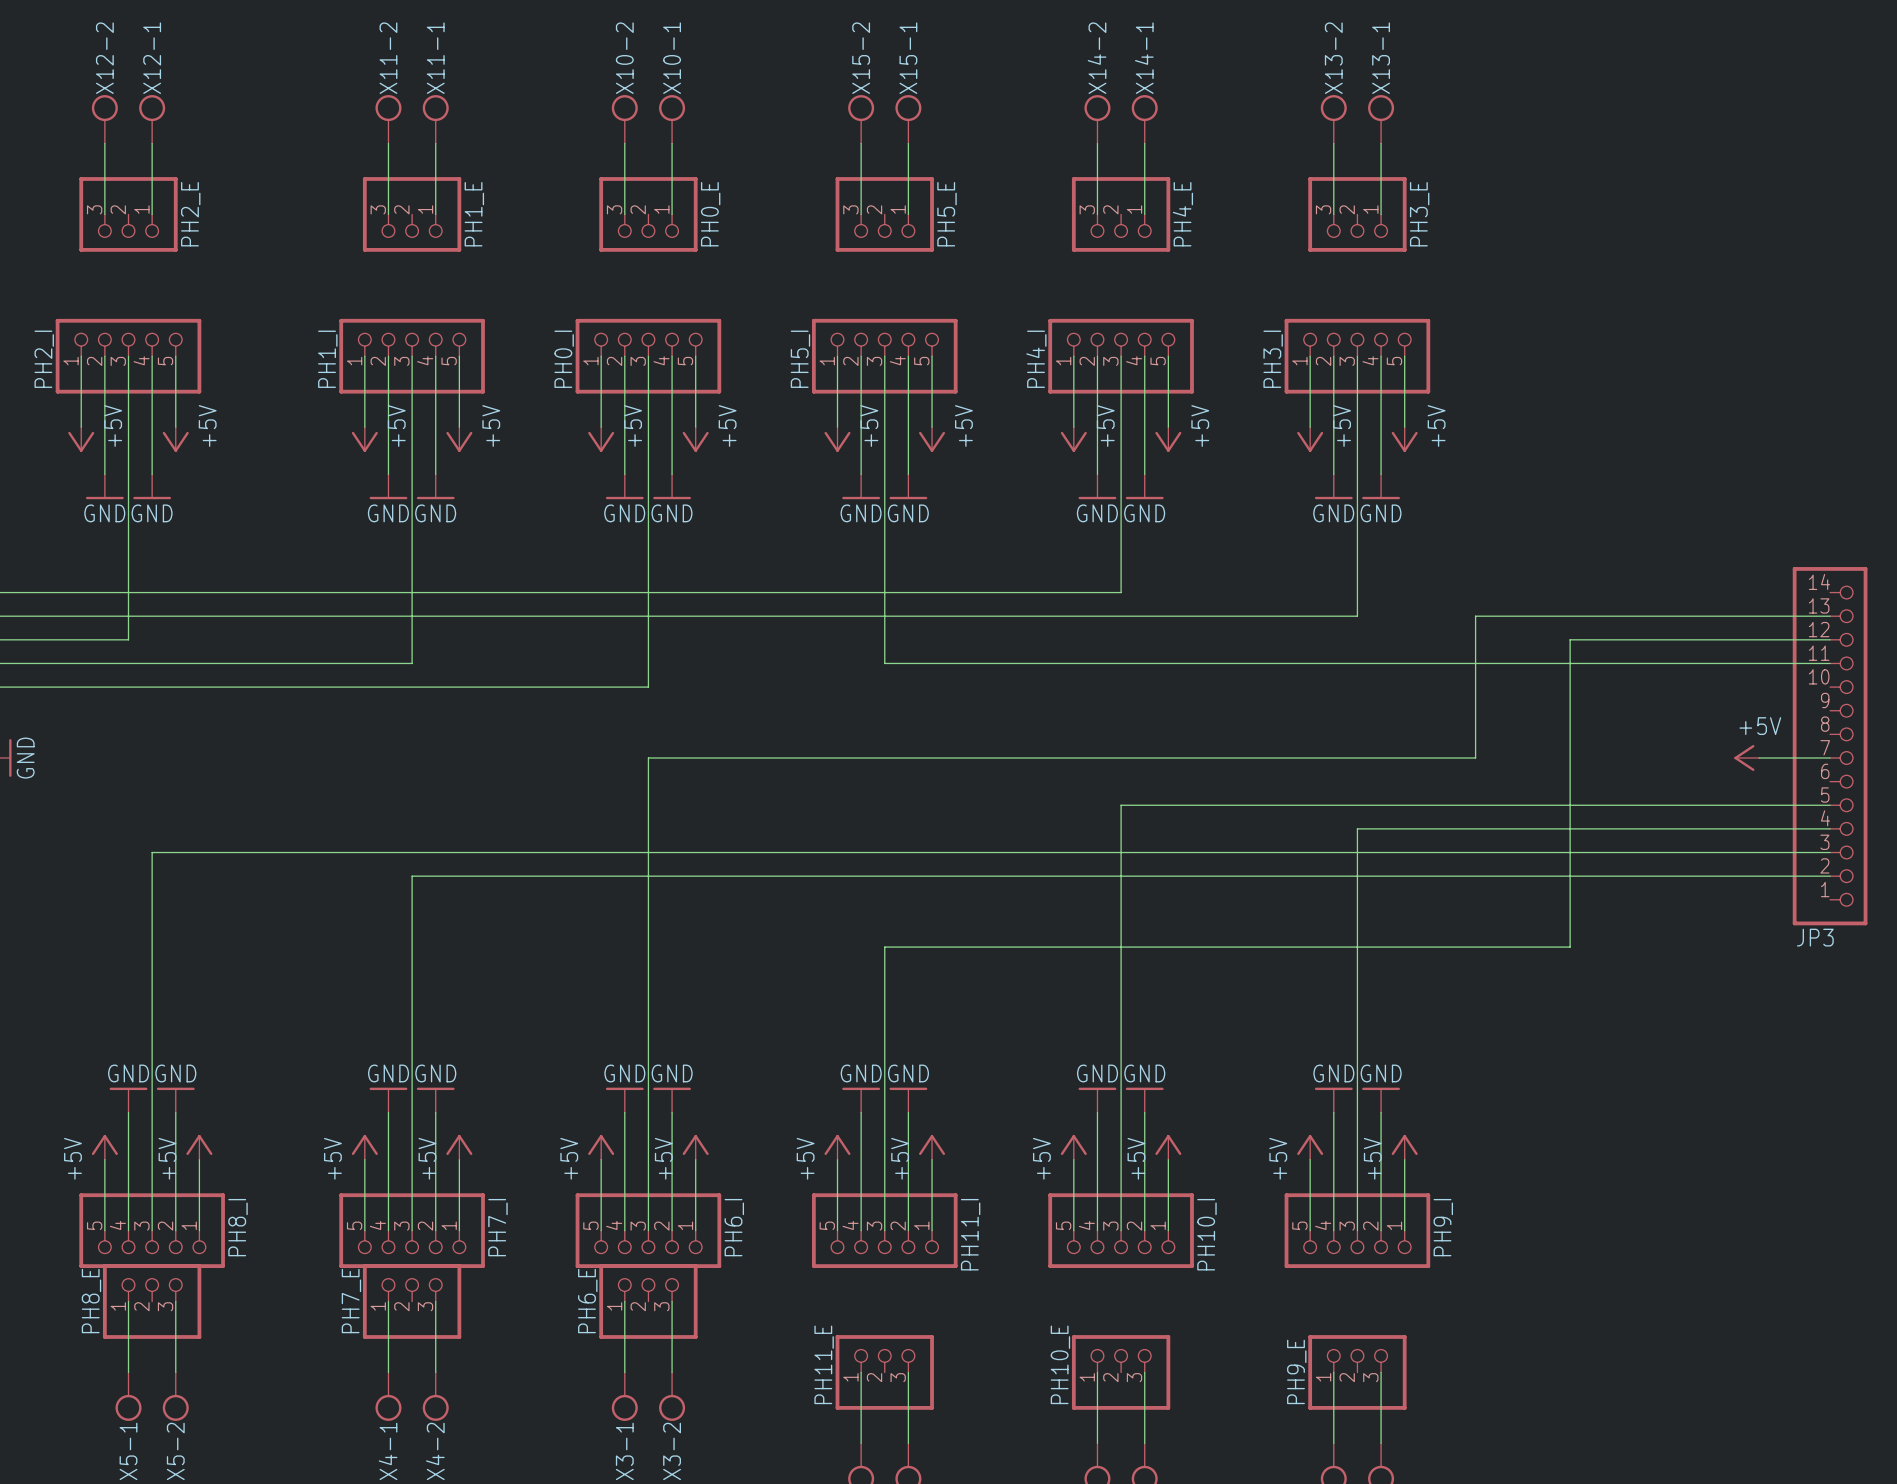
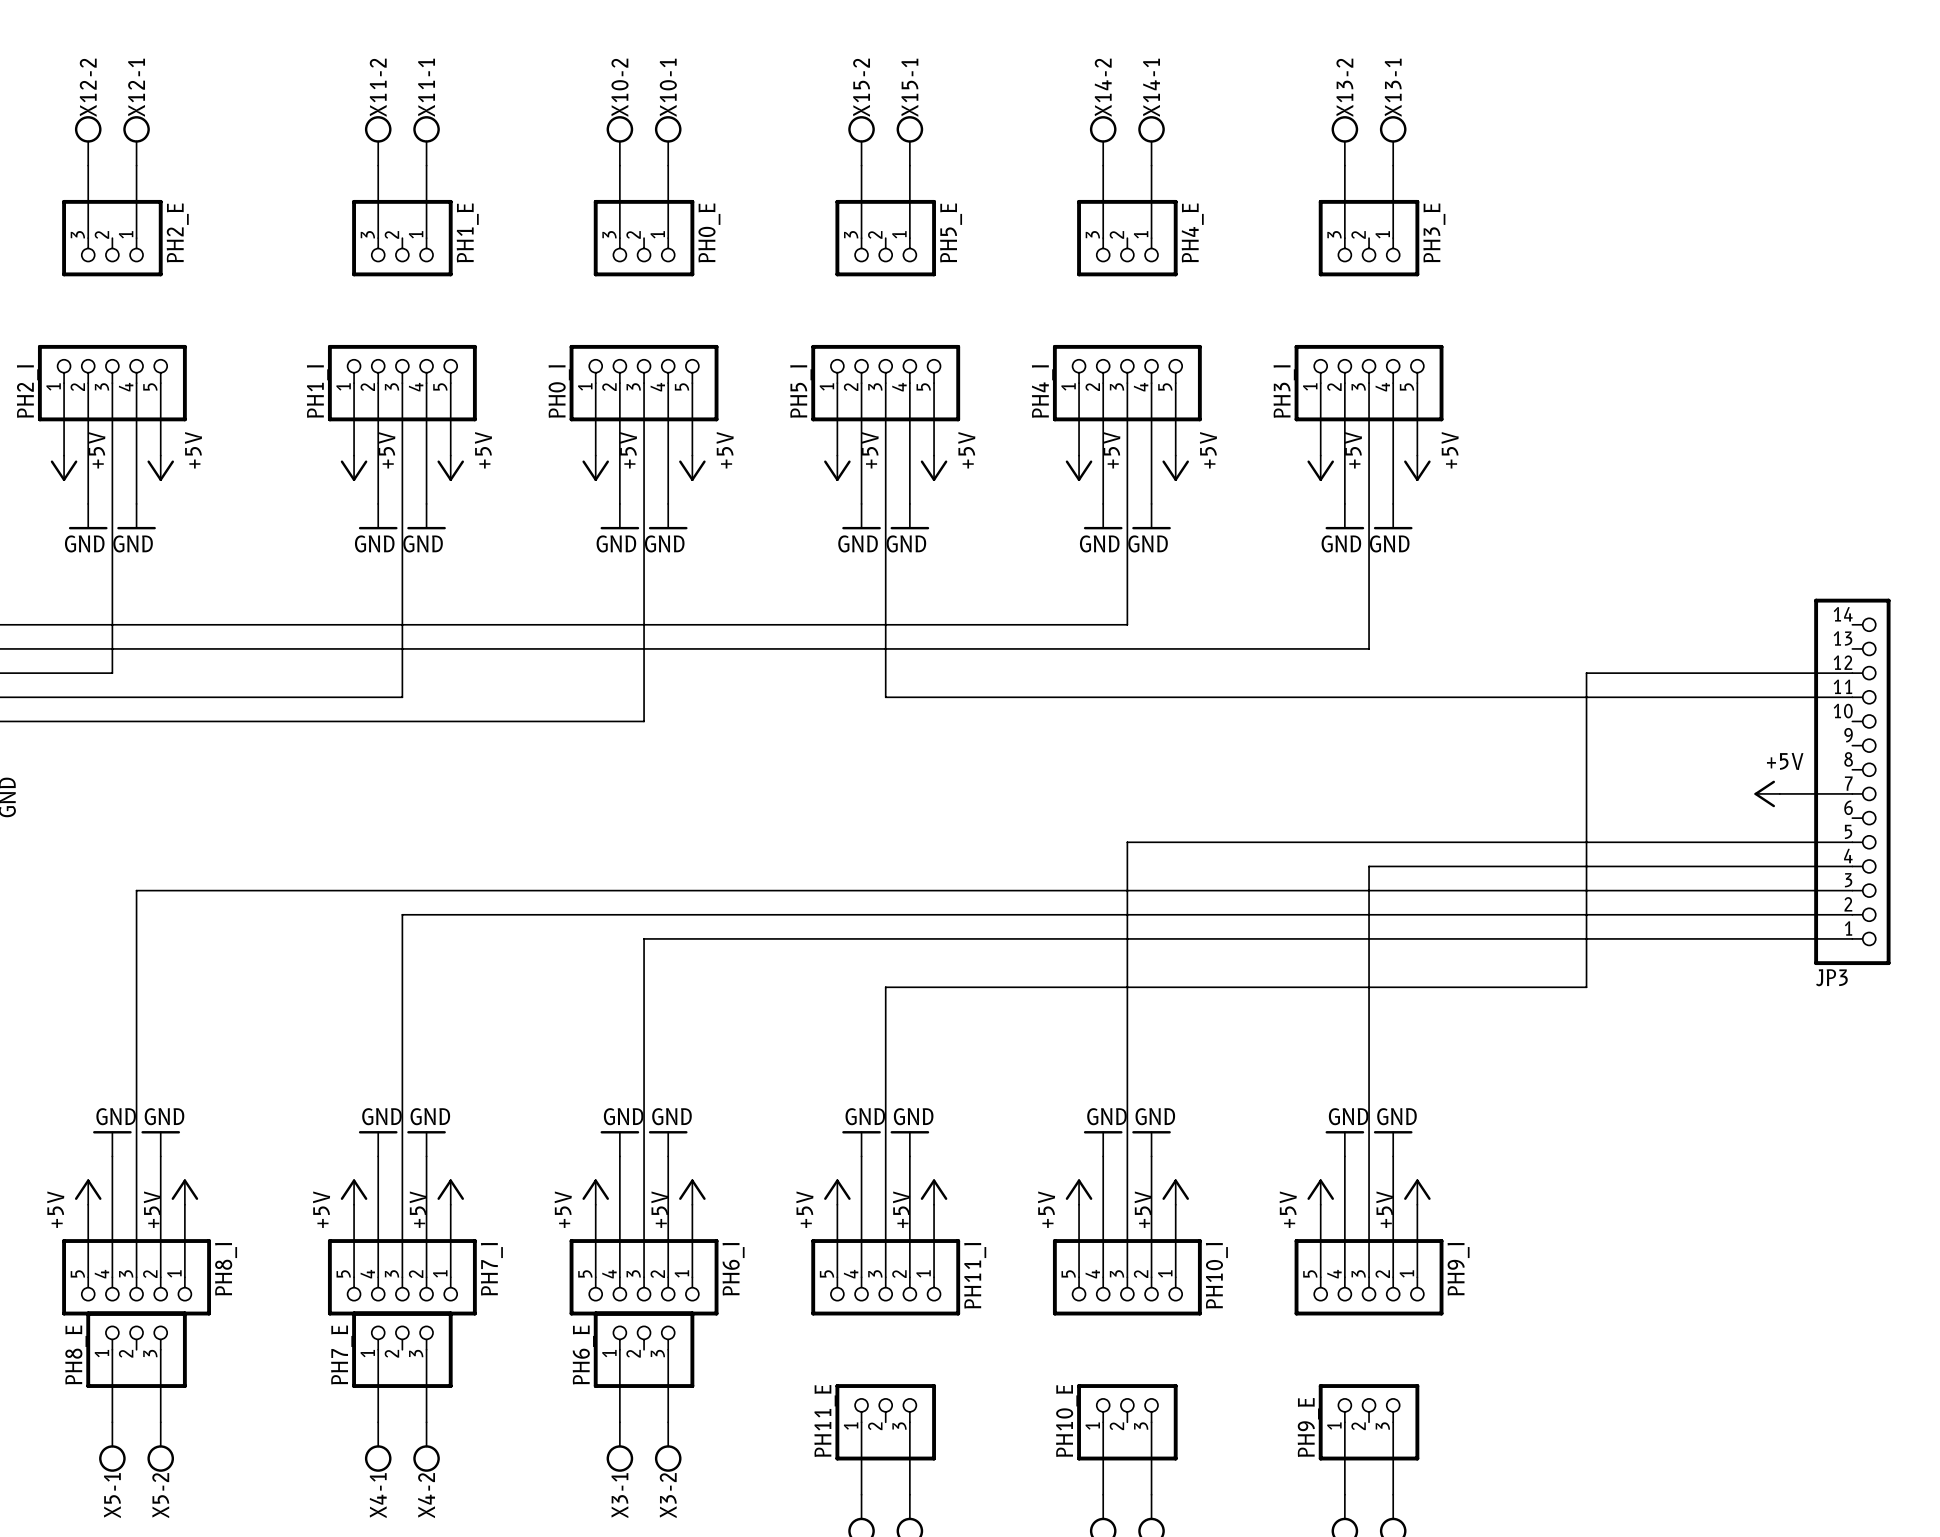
wire: (1830, 616) (1475, 616) (1475, 757) (648, 757) (648, 899) -> (1852, 938) (644, 938)

